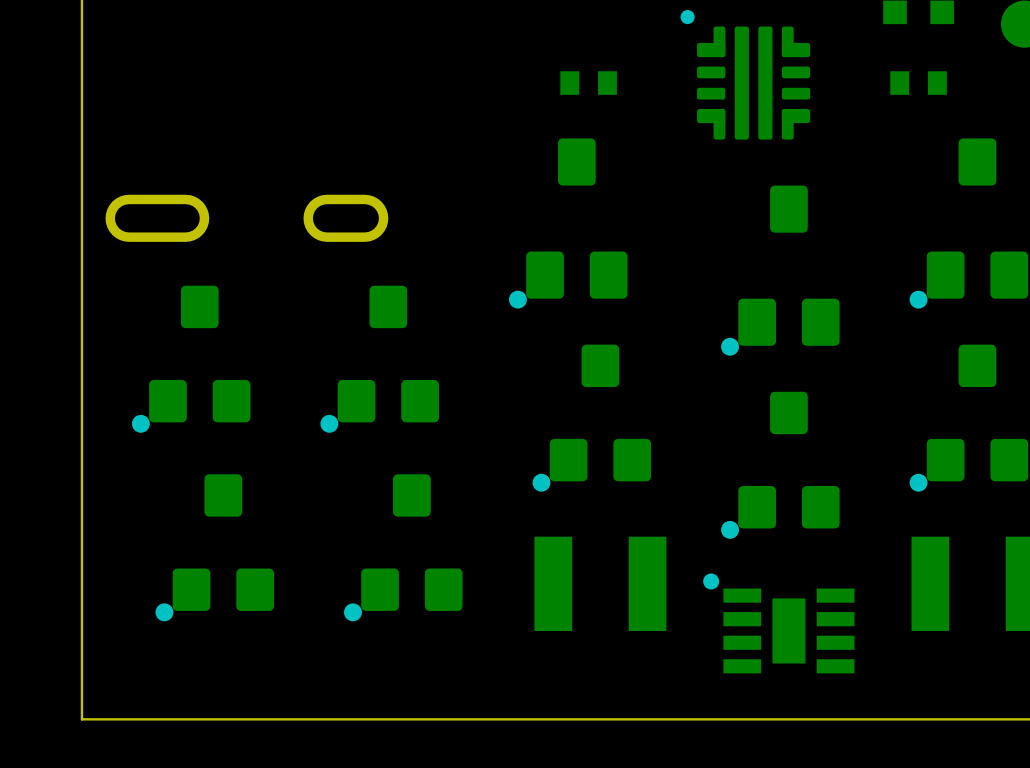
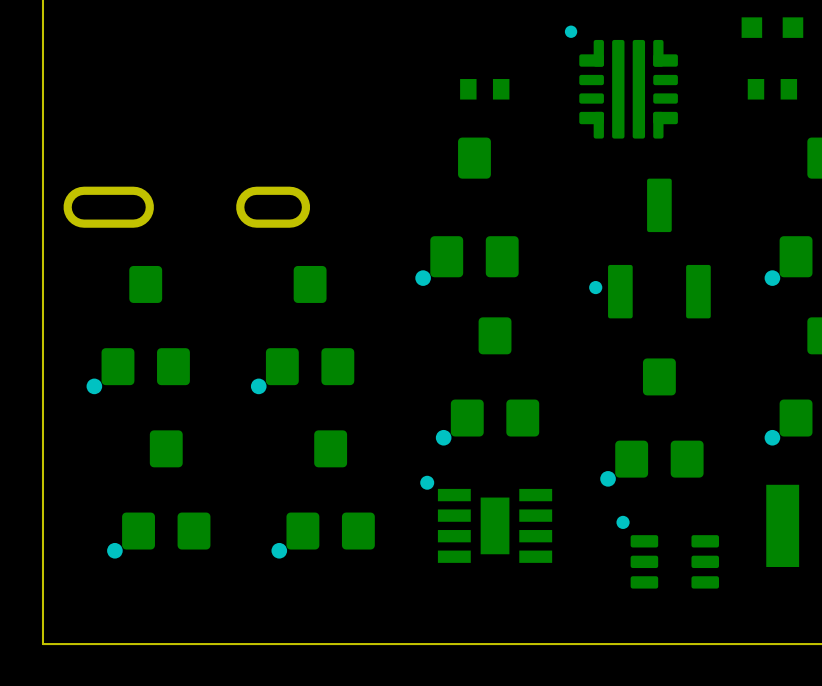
part footprint: [721, 185, 840, 356] -> [589, 178, 711, 319]
part footprint: [534, 536, 667, 631] -> [420, 475, 553, 563]
part footprint: [703, 573, 855, 674] -> [616, 515, 719, 589]

